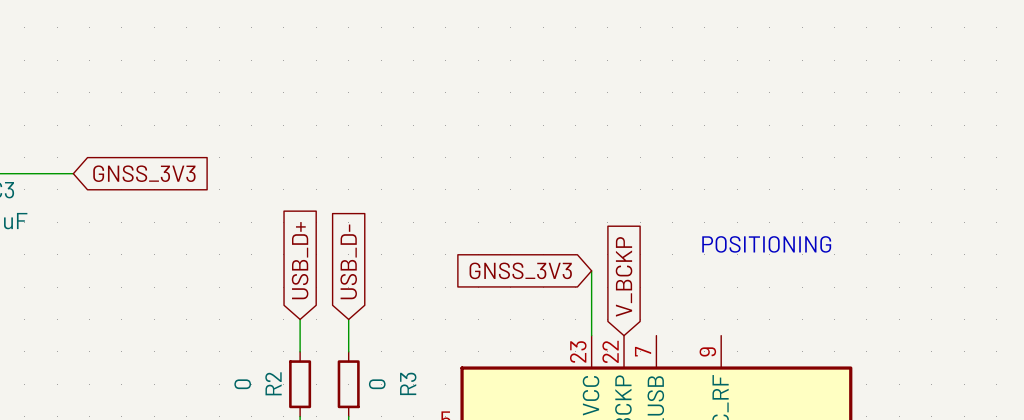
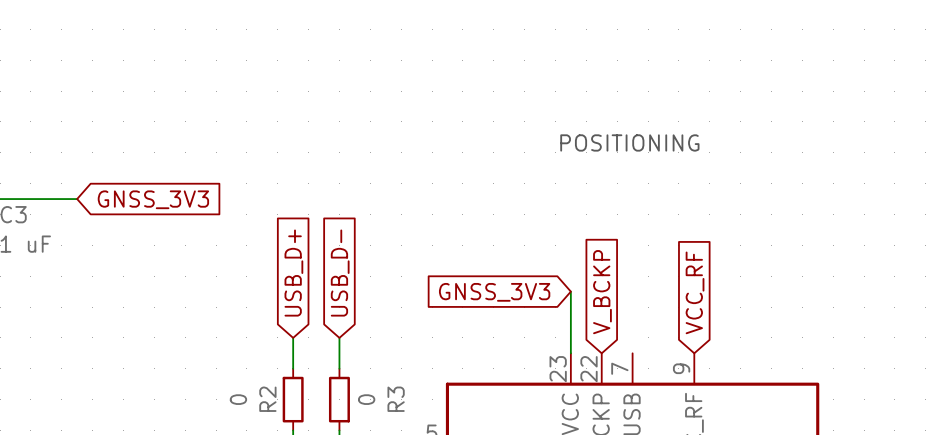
text position: POSITIONING (766, 244) -> POSITIONING (629, 142)
global label: none -> VCC_RF (695, 292)

